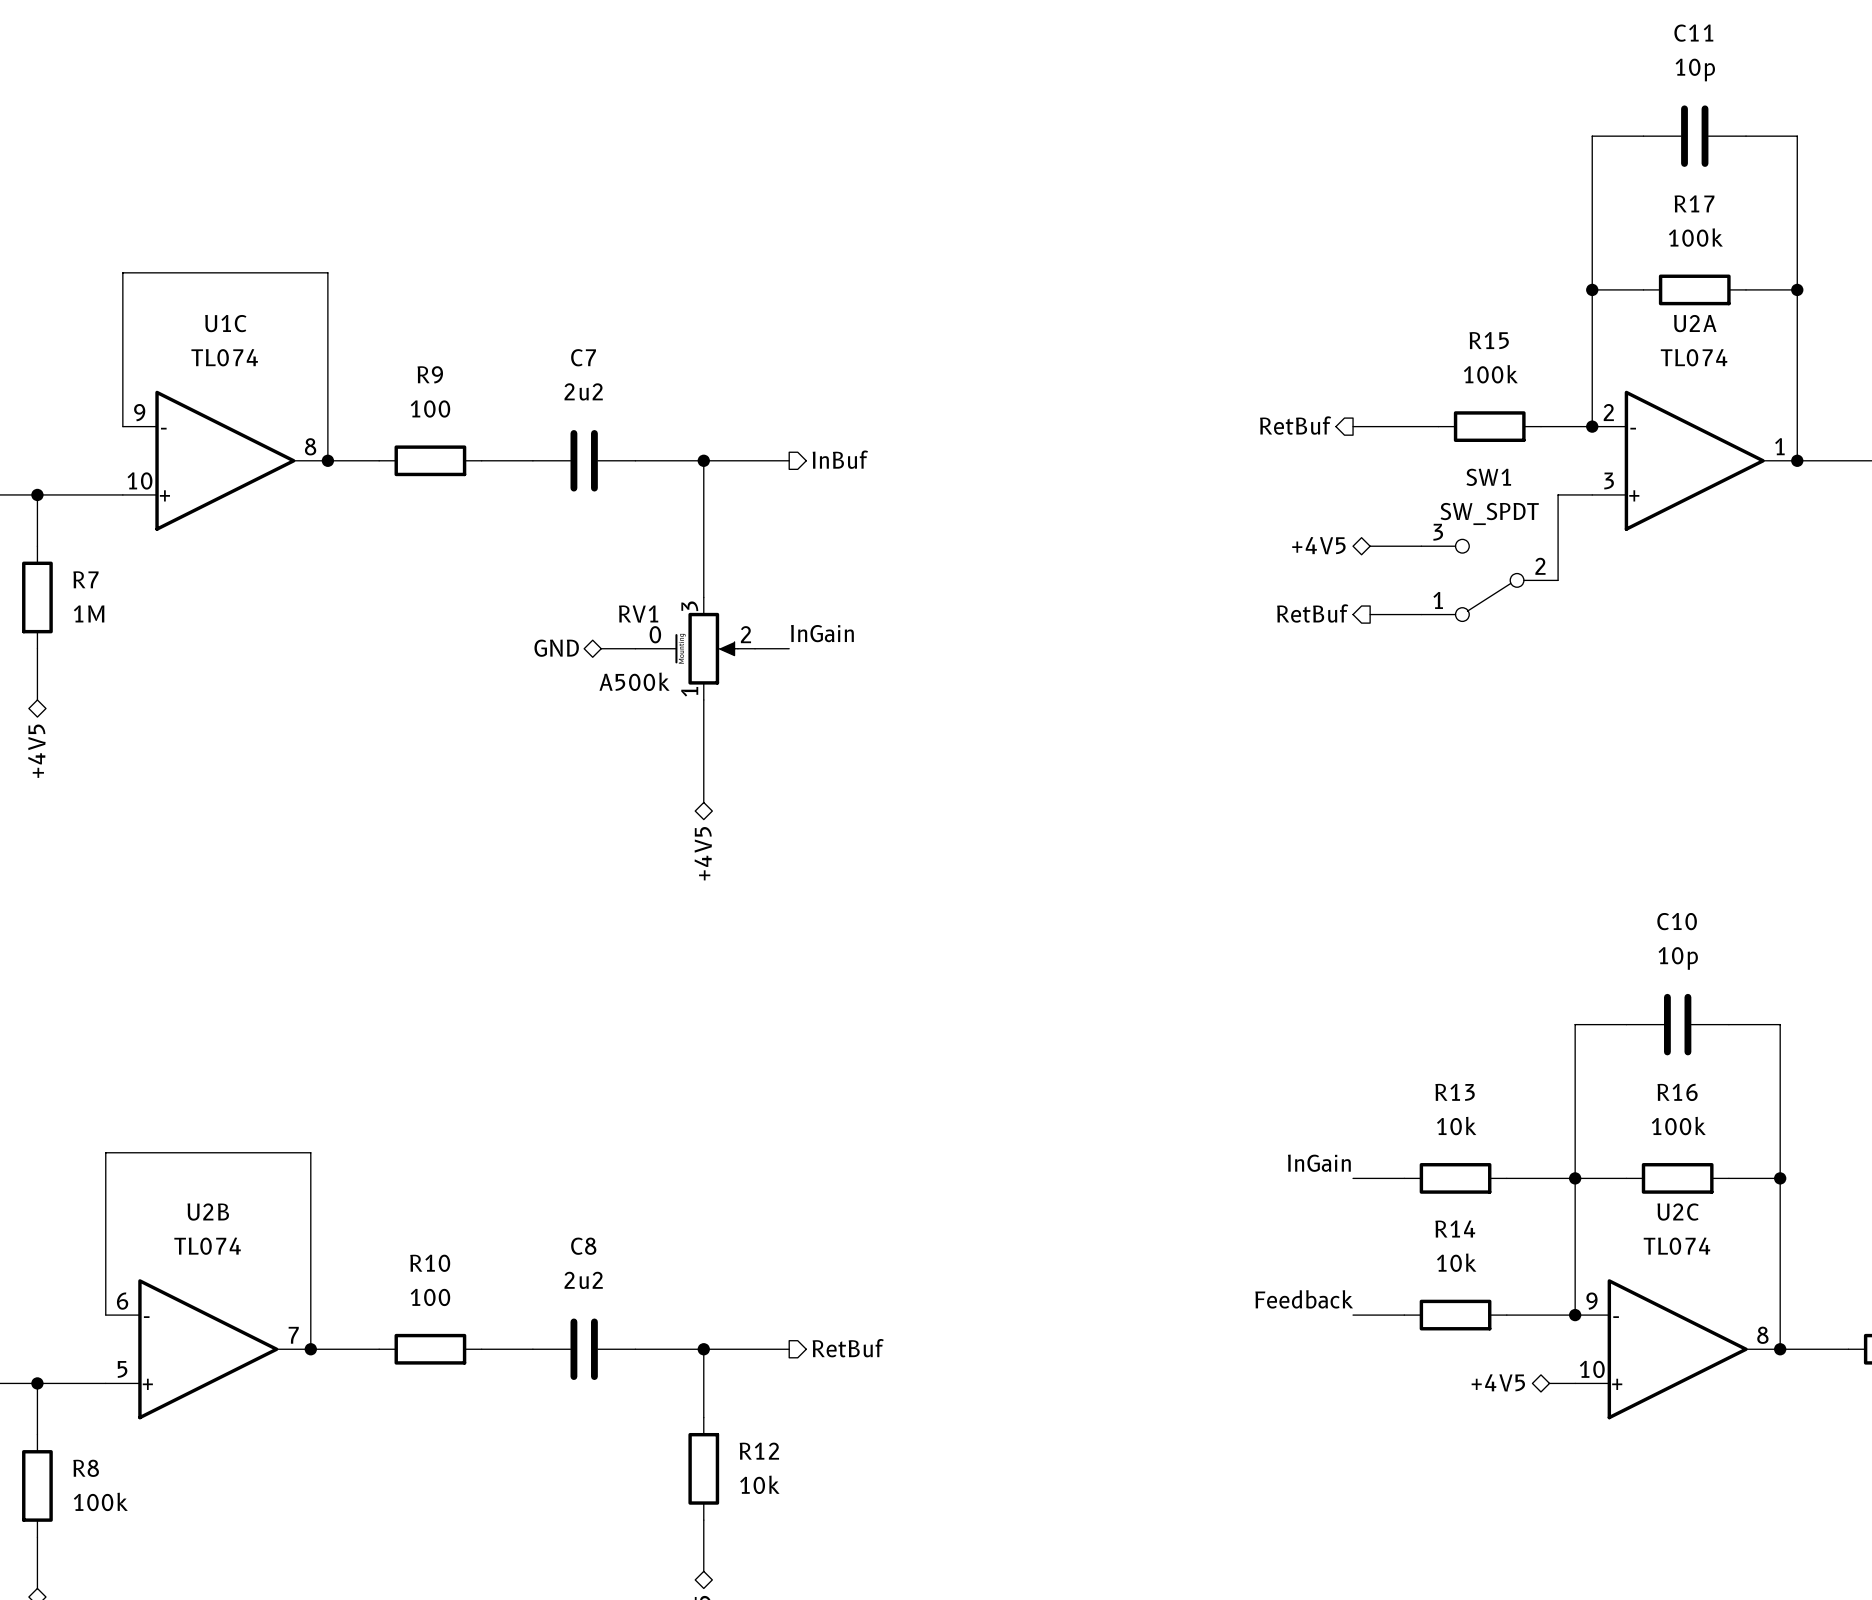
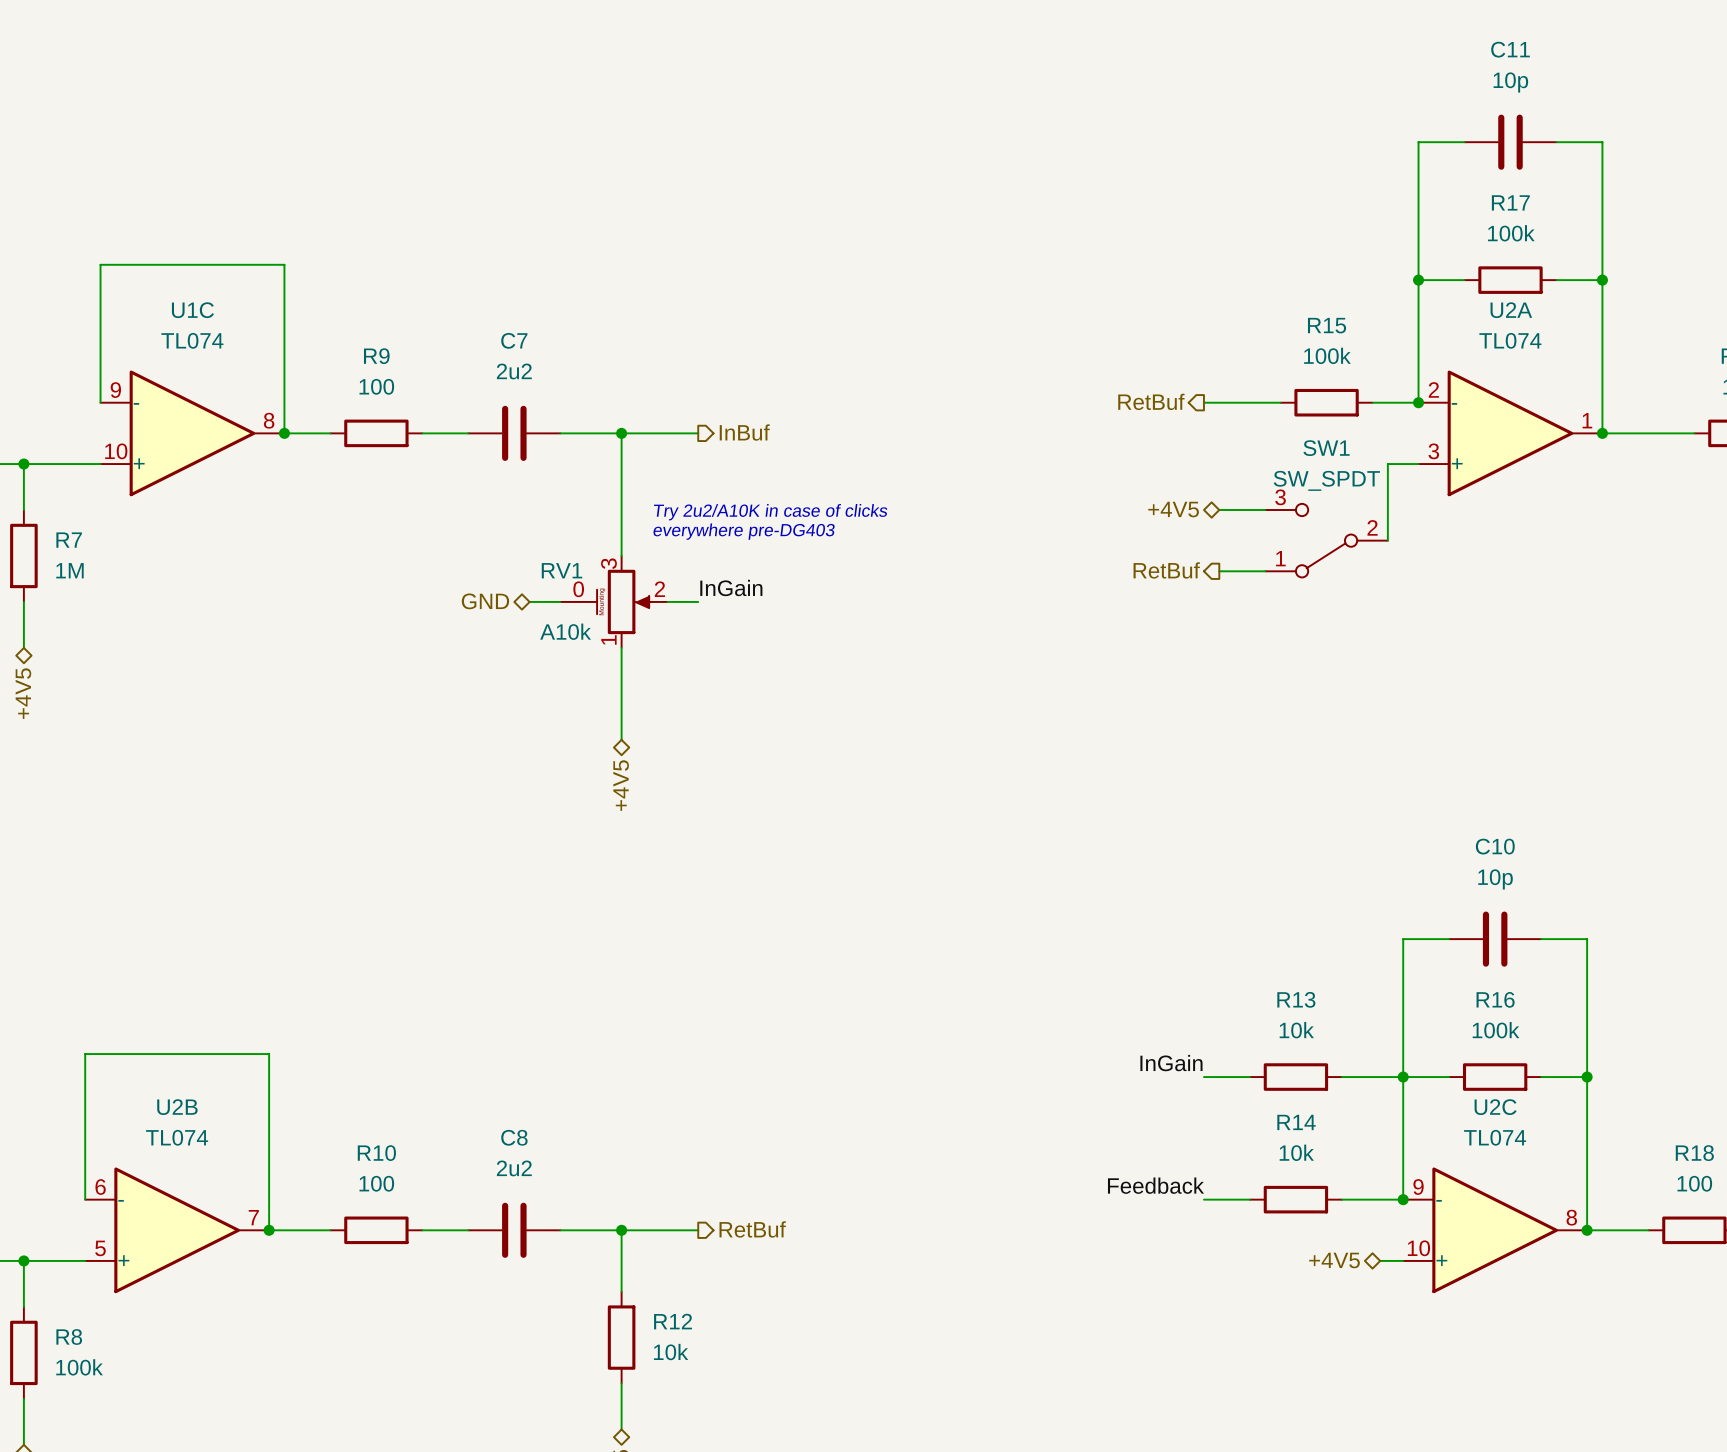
text: none -> Try 2u2/A10K in case of clicks (770, 512)
text: none -> everywhere pre-DG403 (744, 531)
RV1 value: A500k (634, 681) -> A10k (565, 631)

